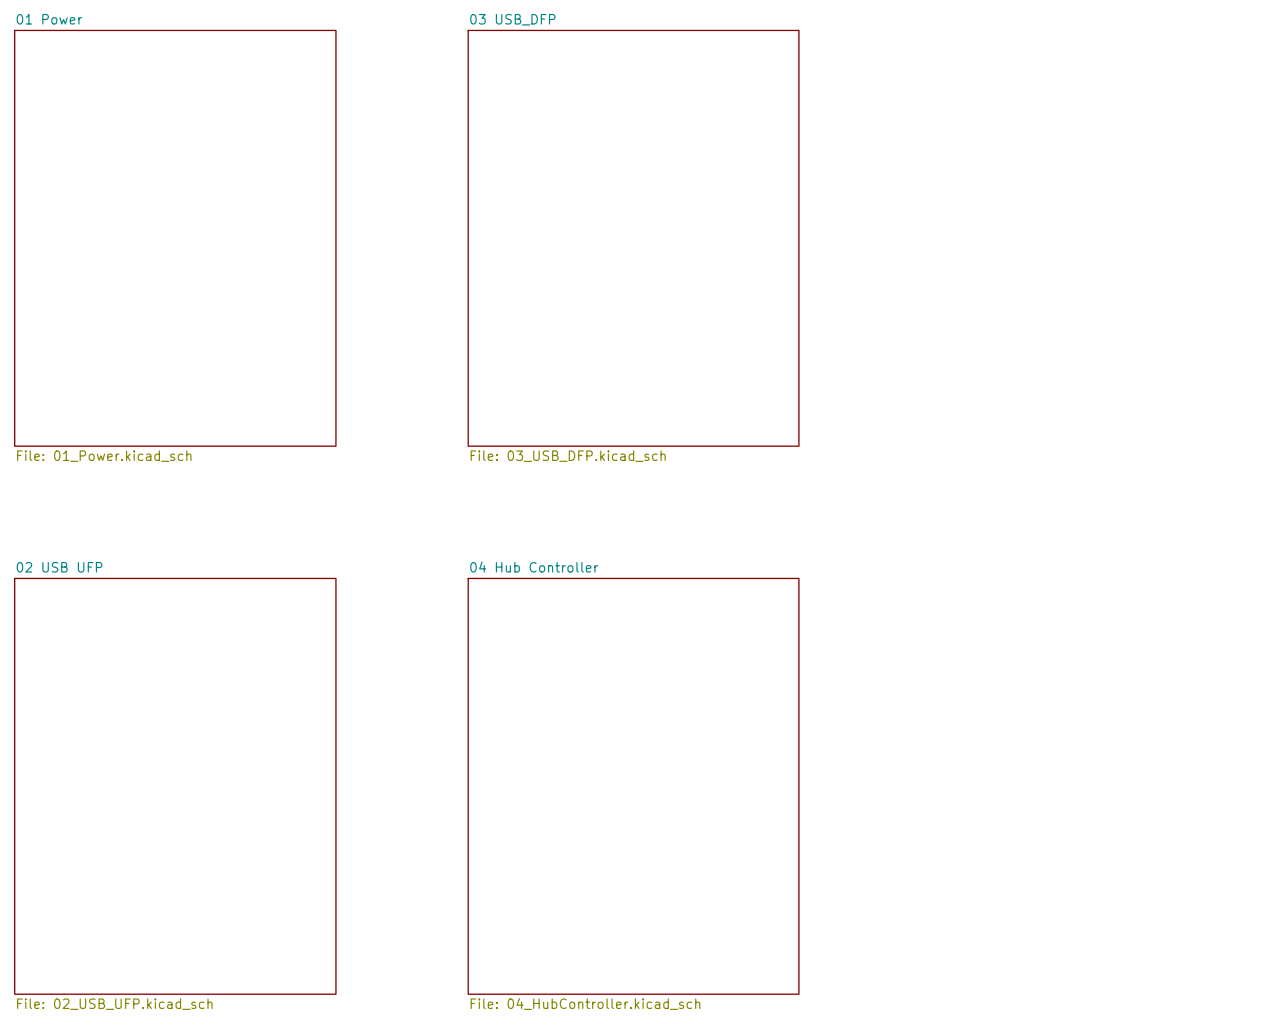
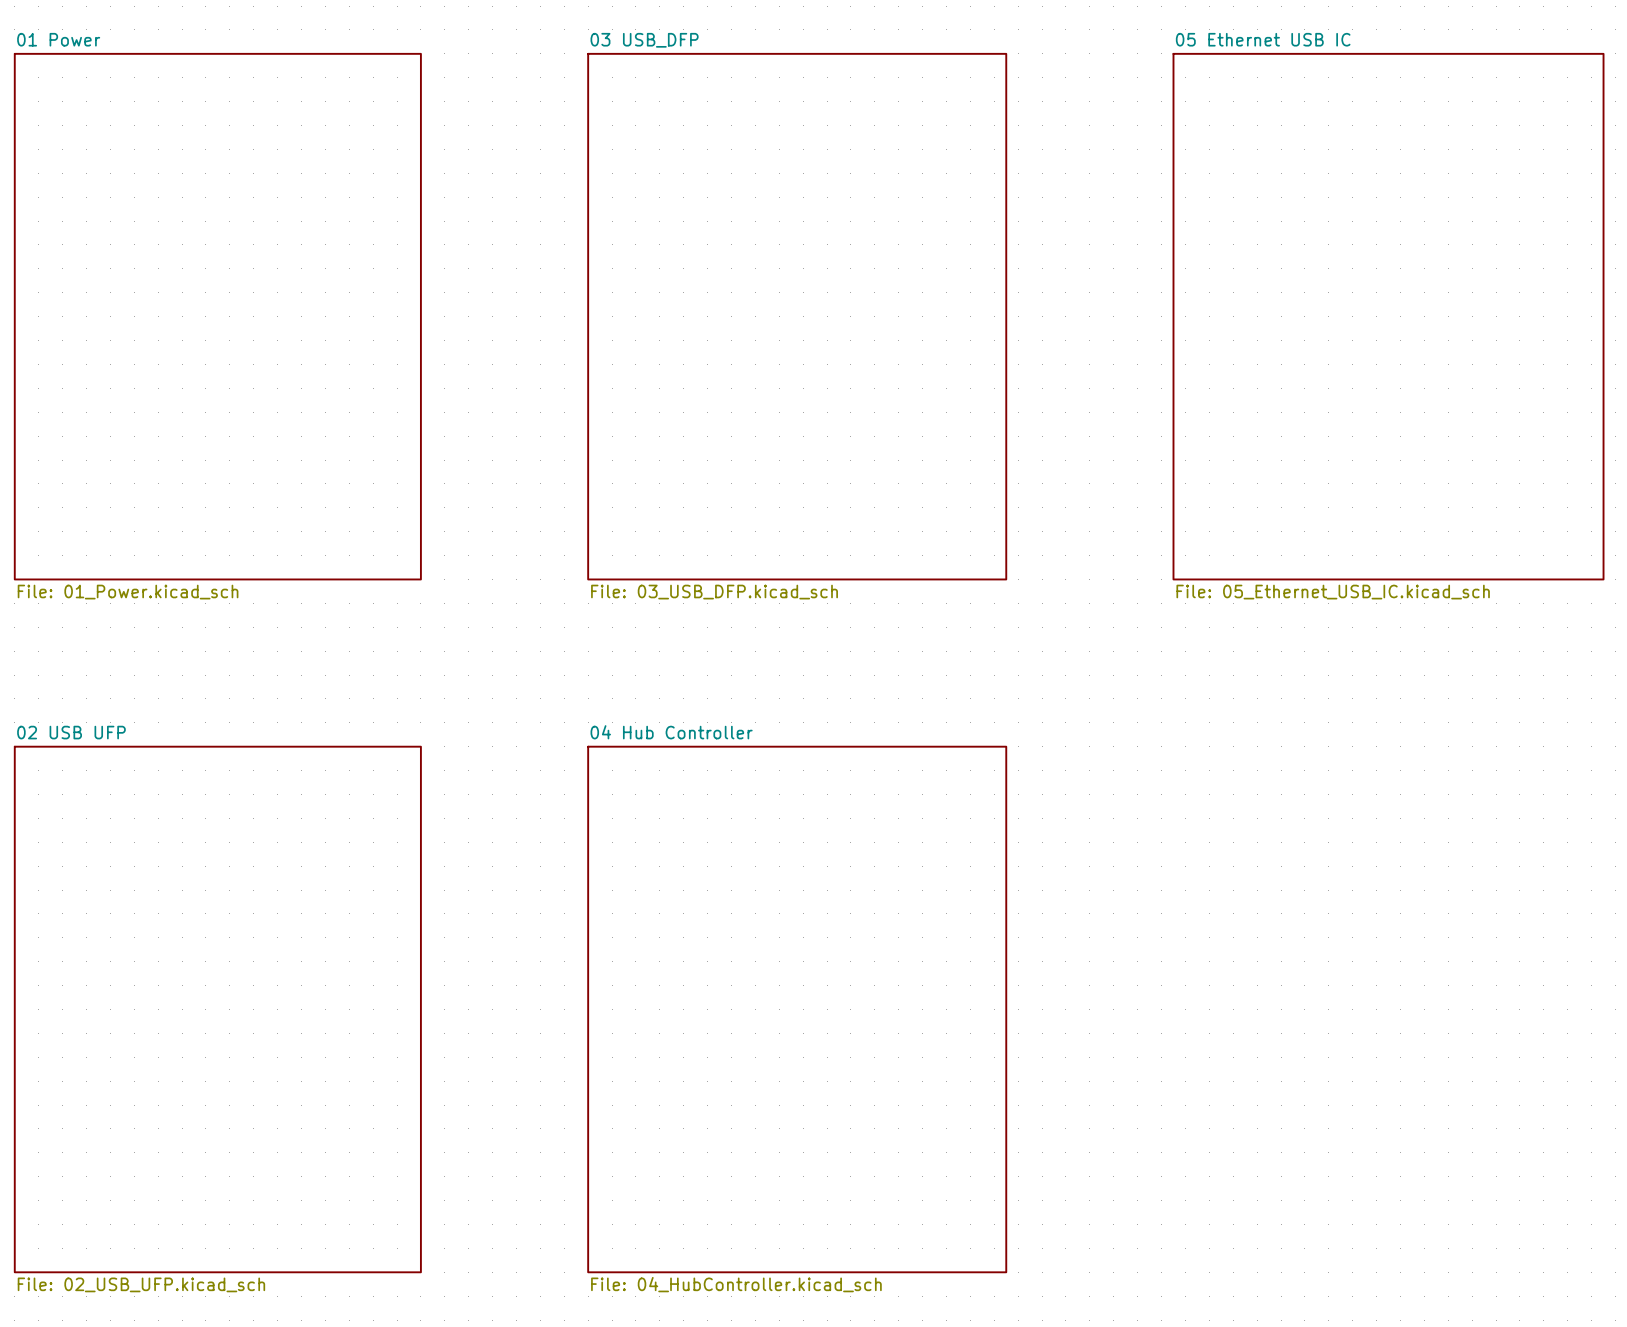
sheet 05 Ethernet USB IC: none -> File: 05_Ethernet_USB_IC.kicad_sch (1388, 316)

